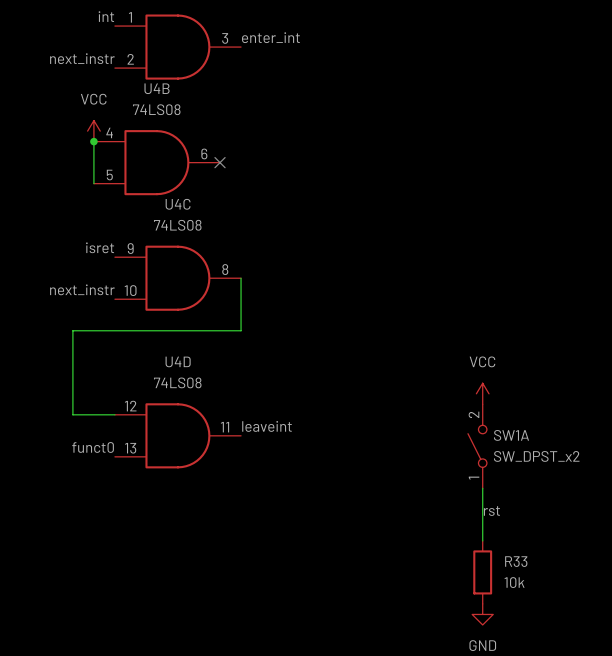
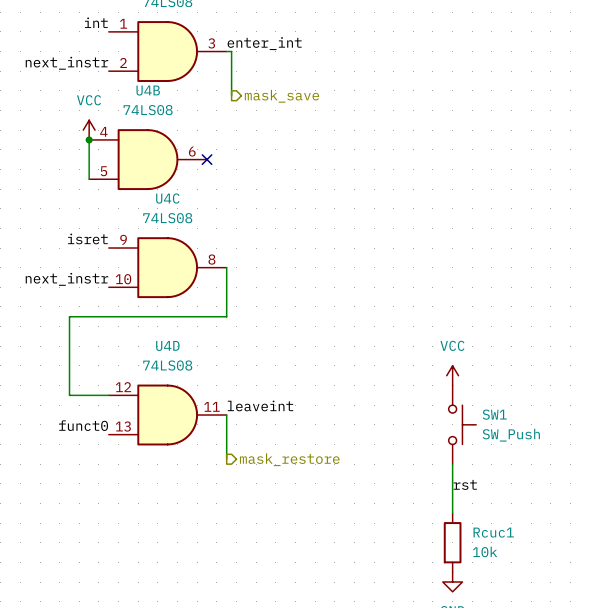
wire: none -> (226, 51) (231, 51) (231, 95)
hierarchical label: none -> mask_save (281, 96)
wire: none -> (226, 415) (226, 459)
SW1A: SW_DPST_x2 (477, 446) -> none
SW1: none -> SW_Push (462, 424)
hierarchical label: none -> mask_restore (289, 459)
R33 name: R33 (516, 561) -> Rcuc1 (493, 532)

